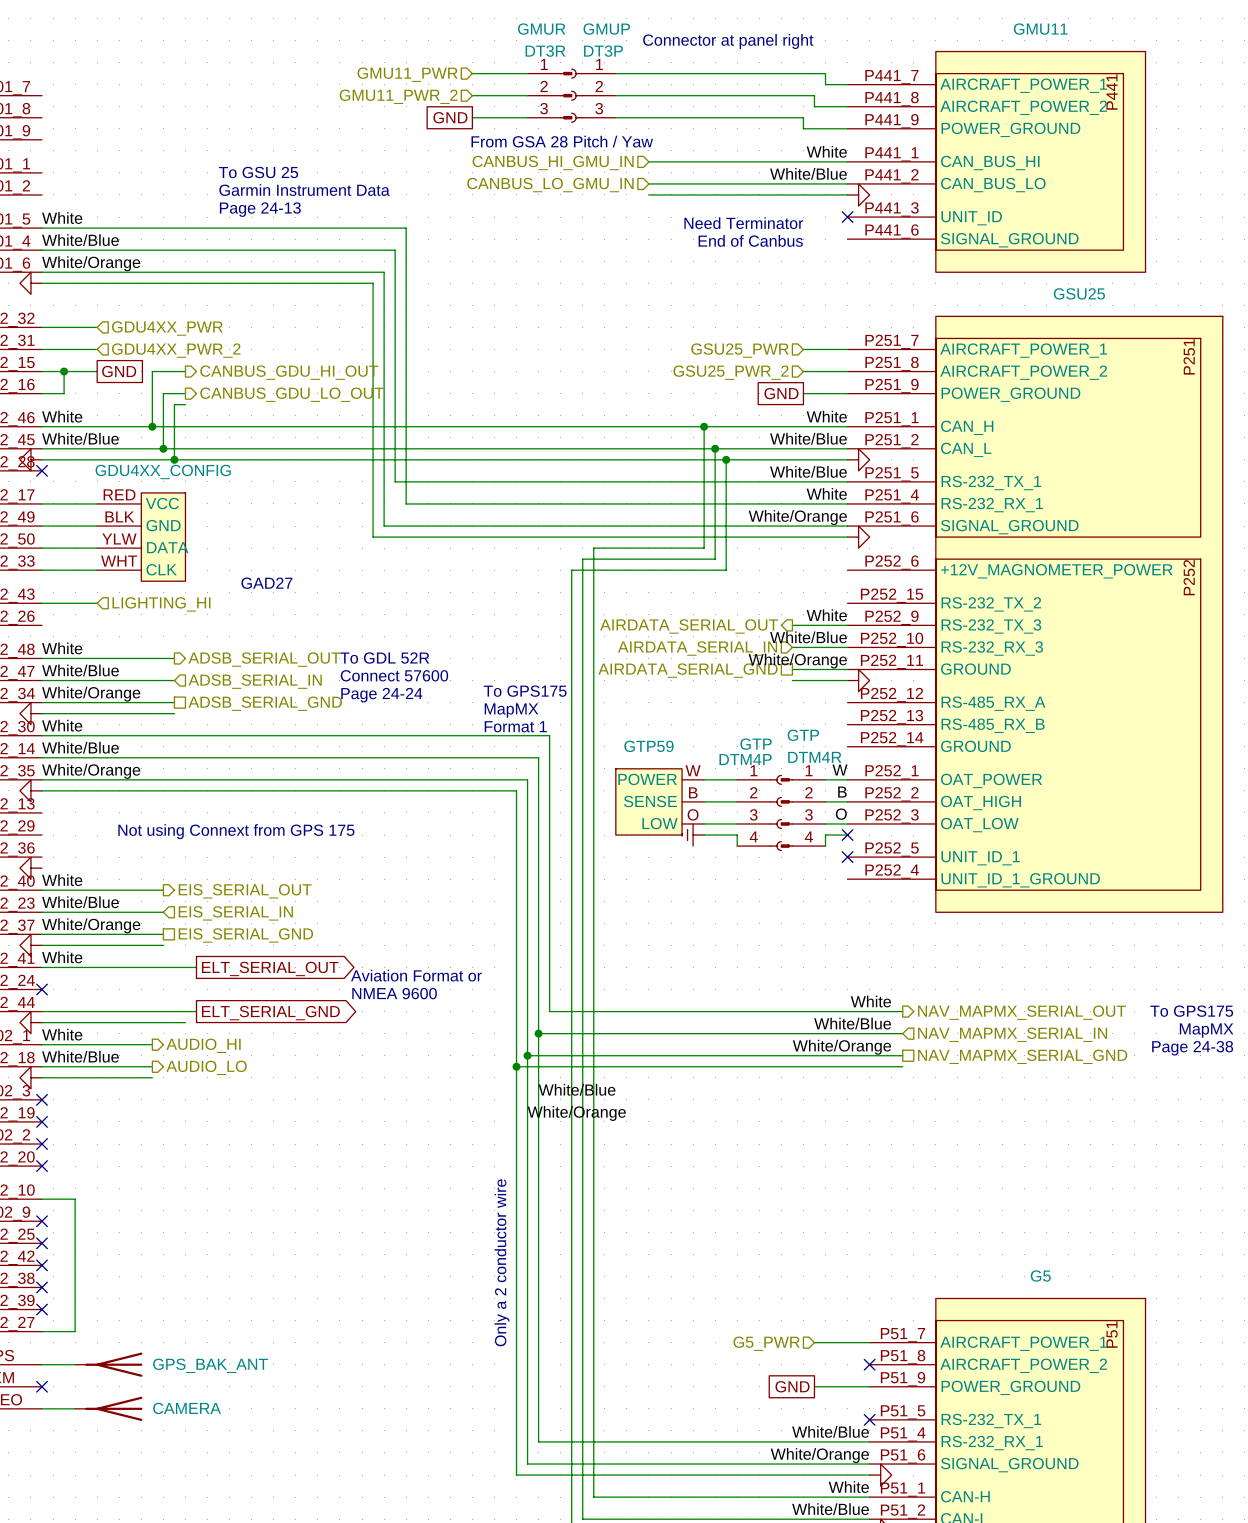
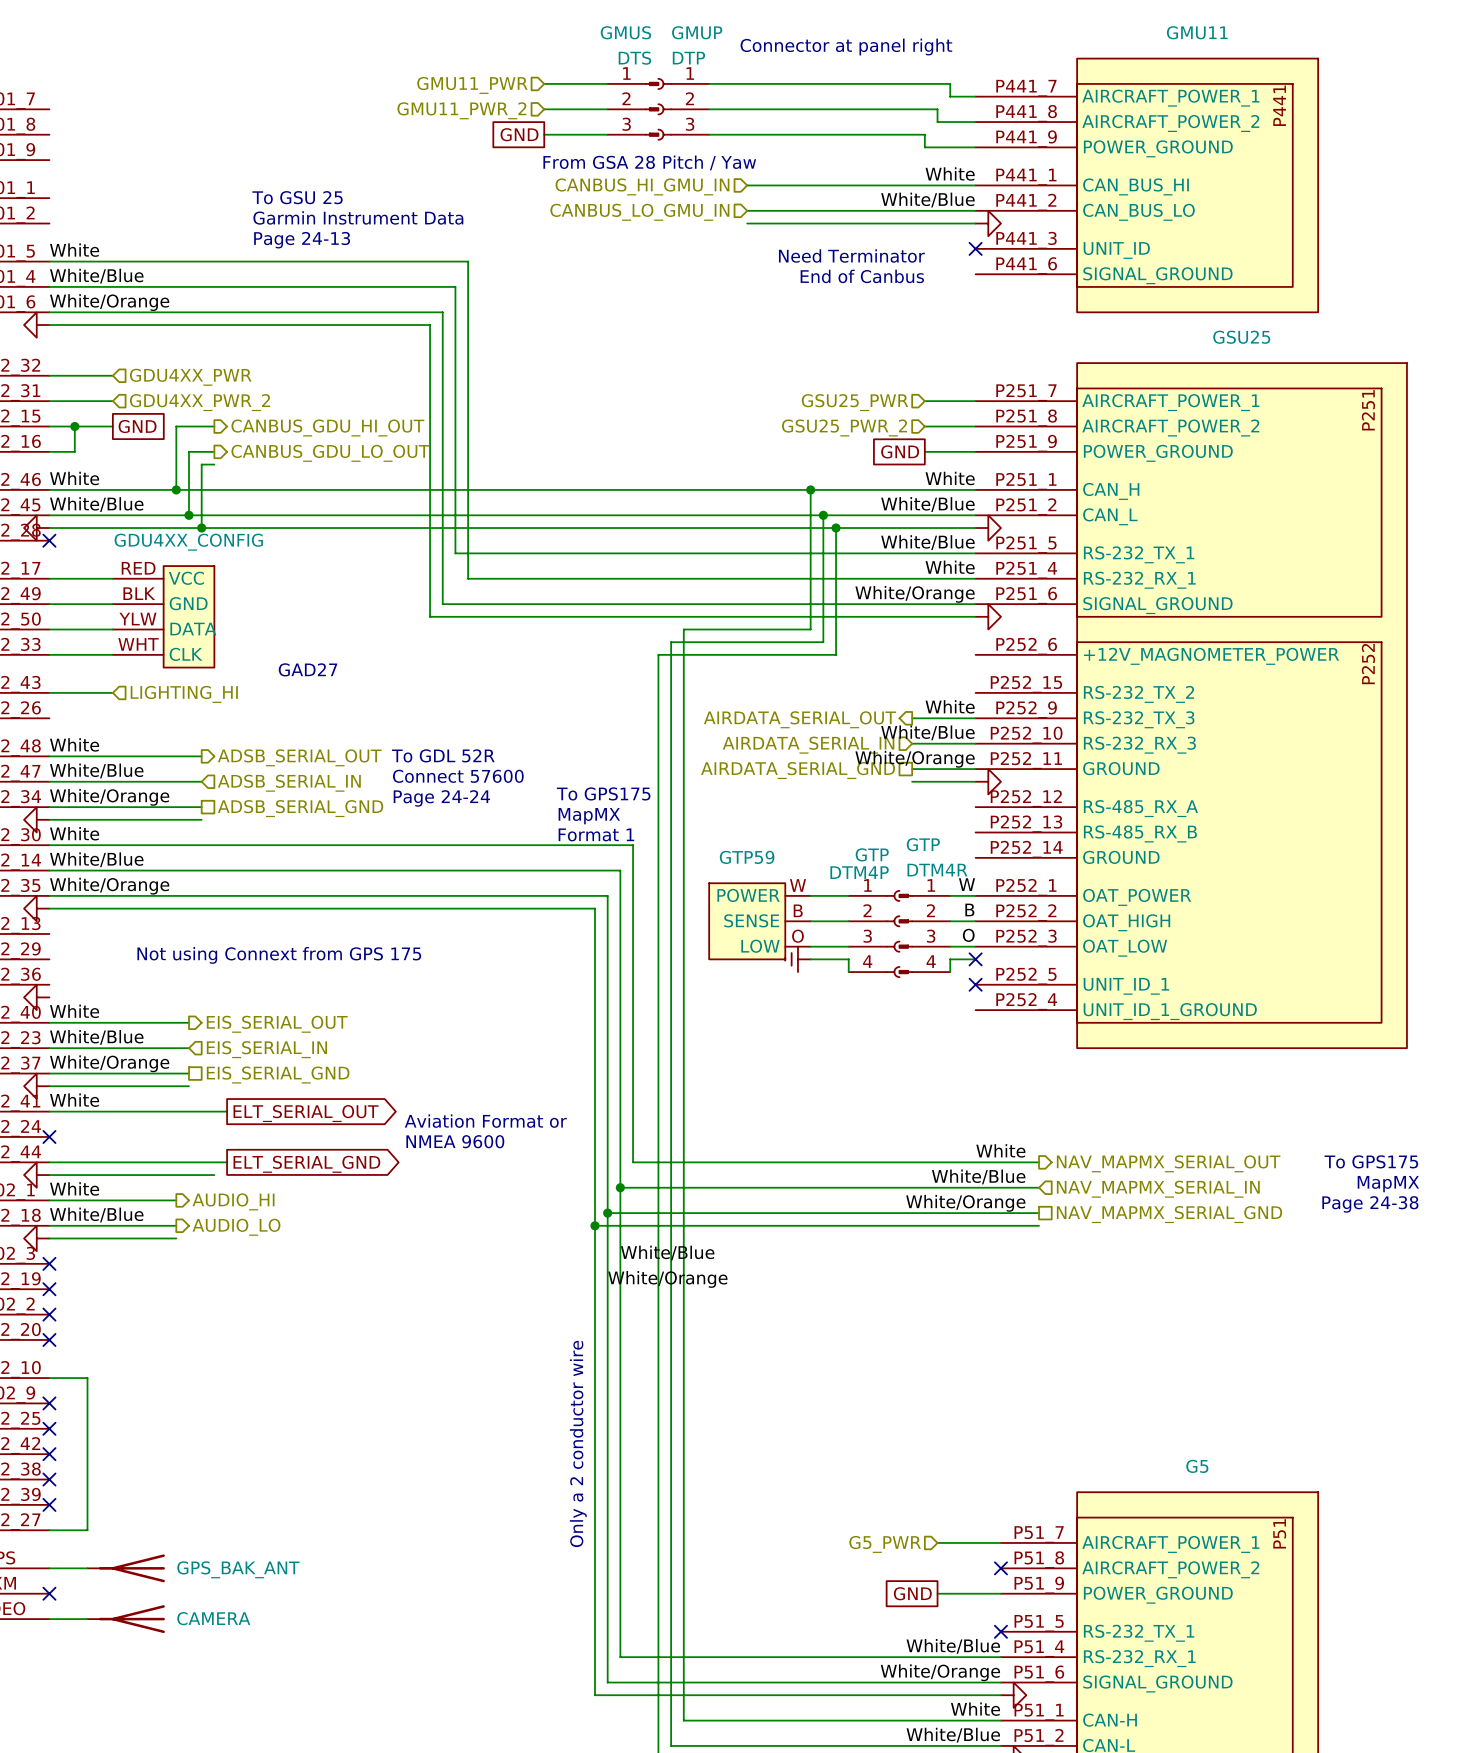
GMUR name: GMUR (541, 29) -> GMUS (625, 32)
GMUR value: DT3R (545, 51) -> DTS (634, 58)
GMUP value: DT3P (603, 51) -> DTP (688, 58)

